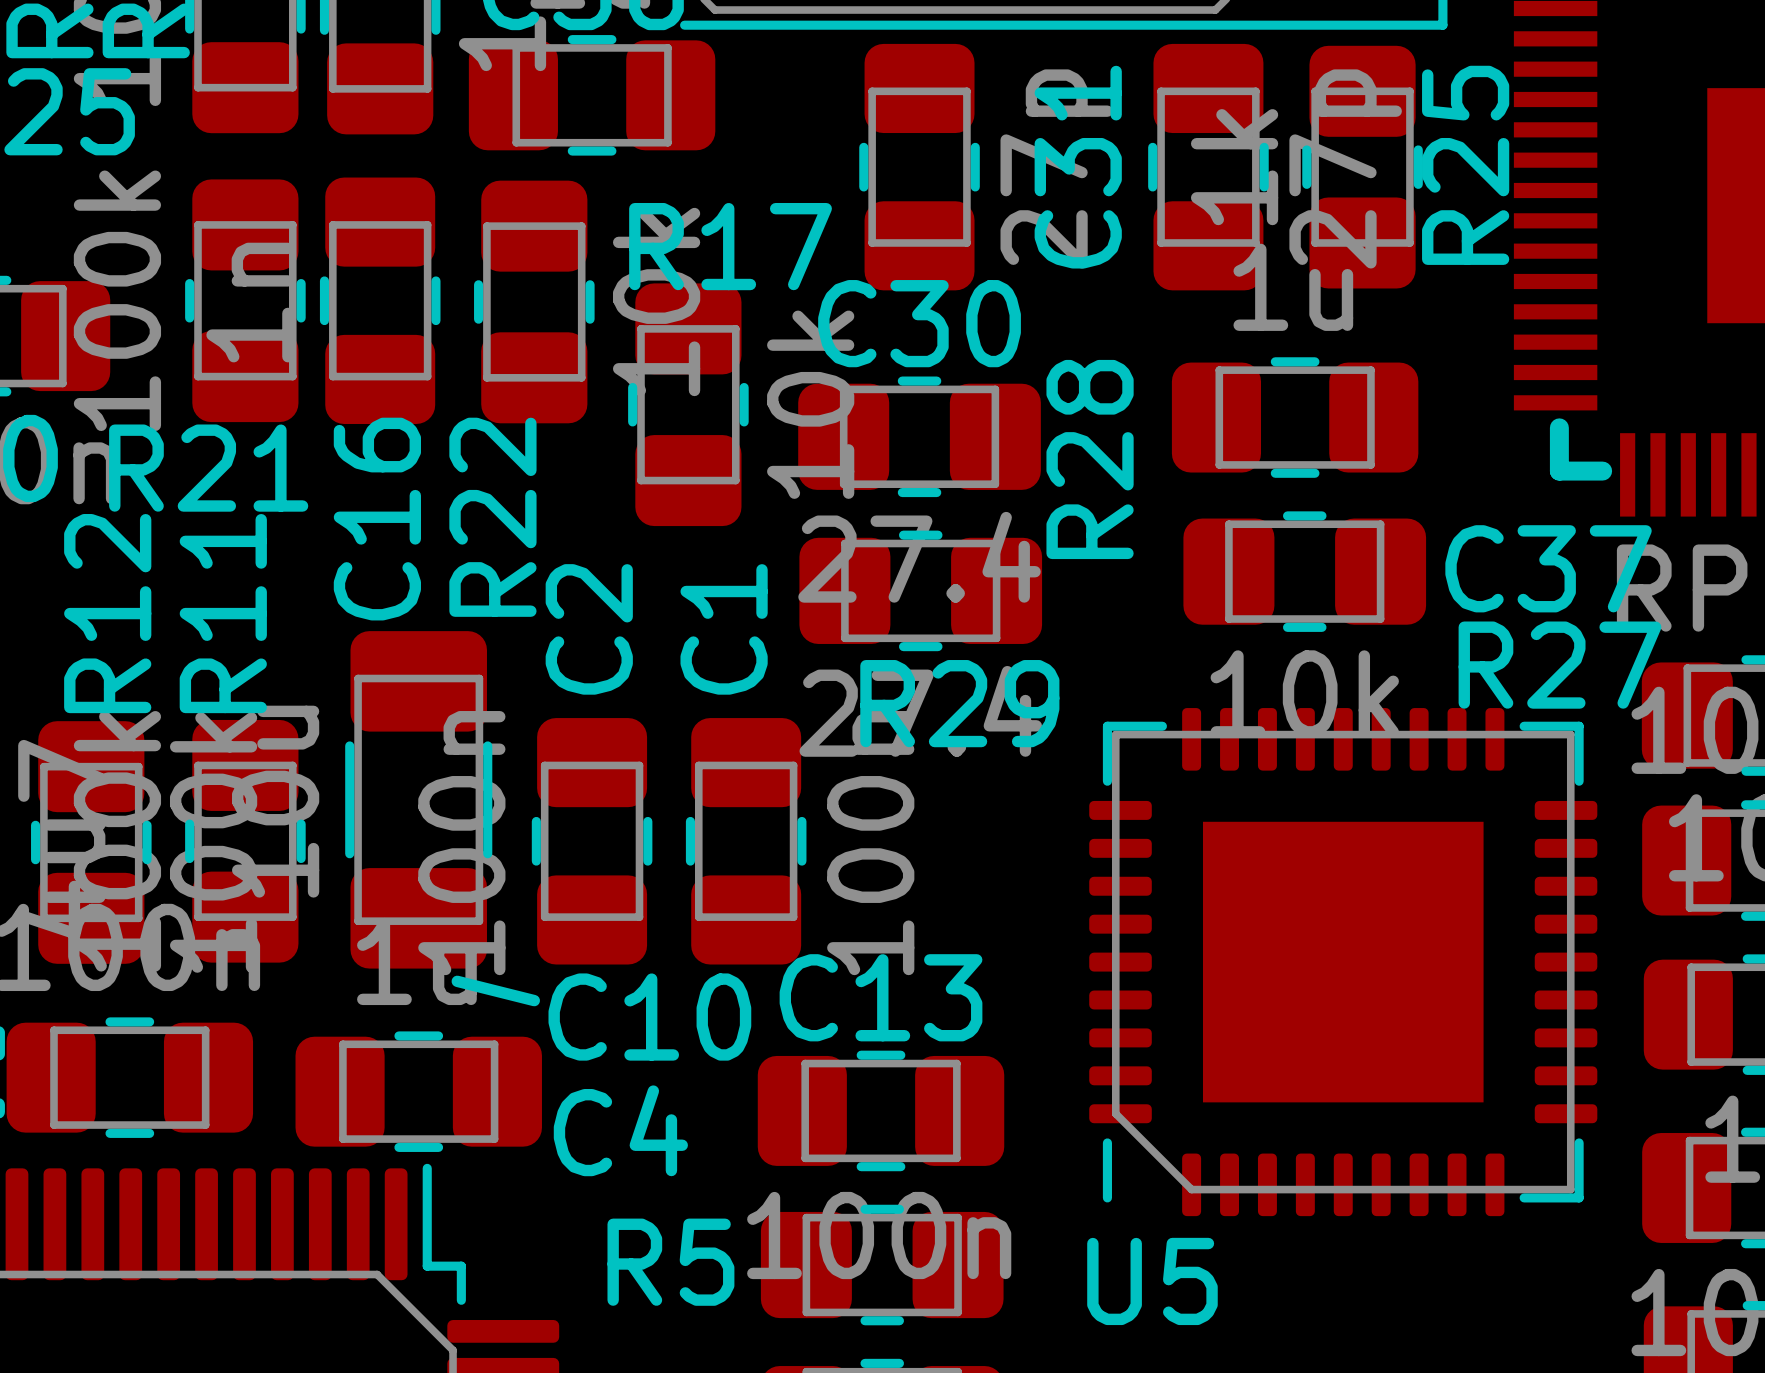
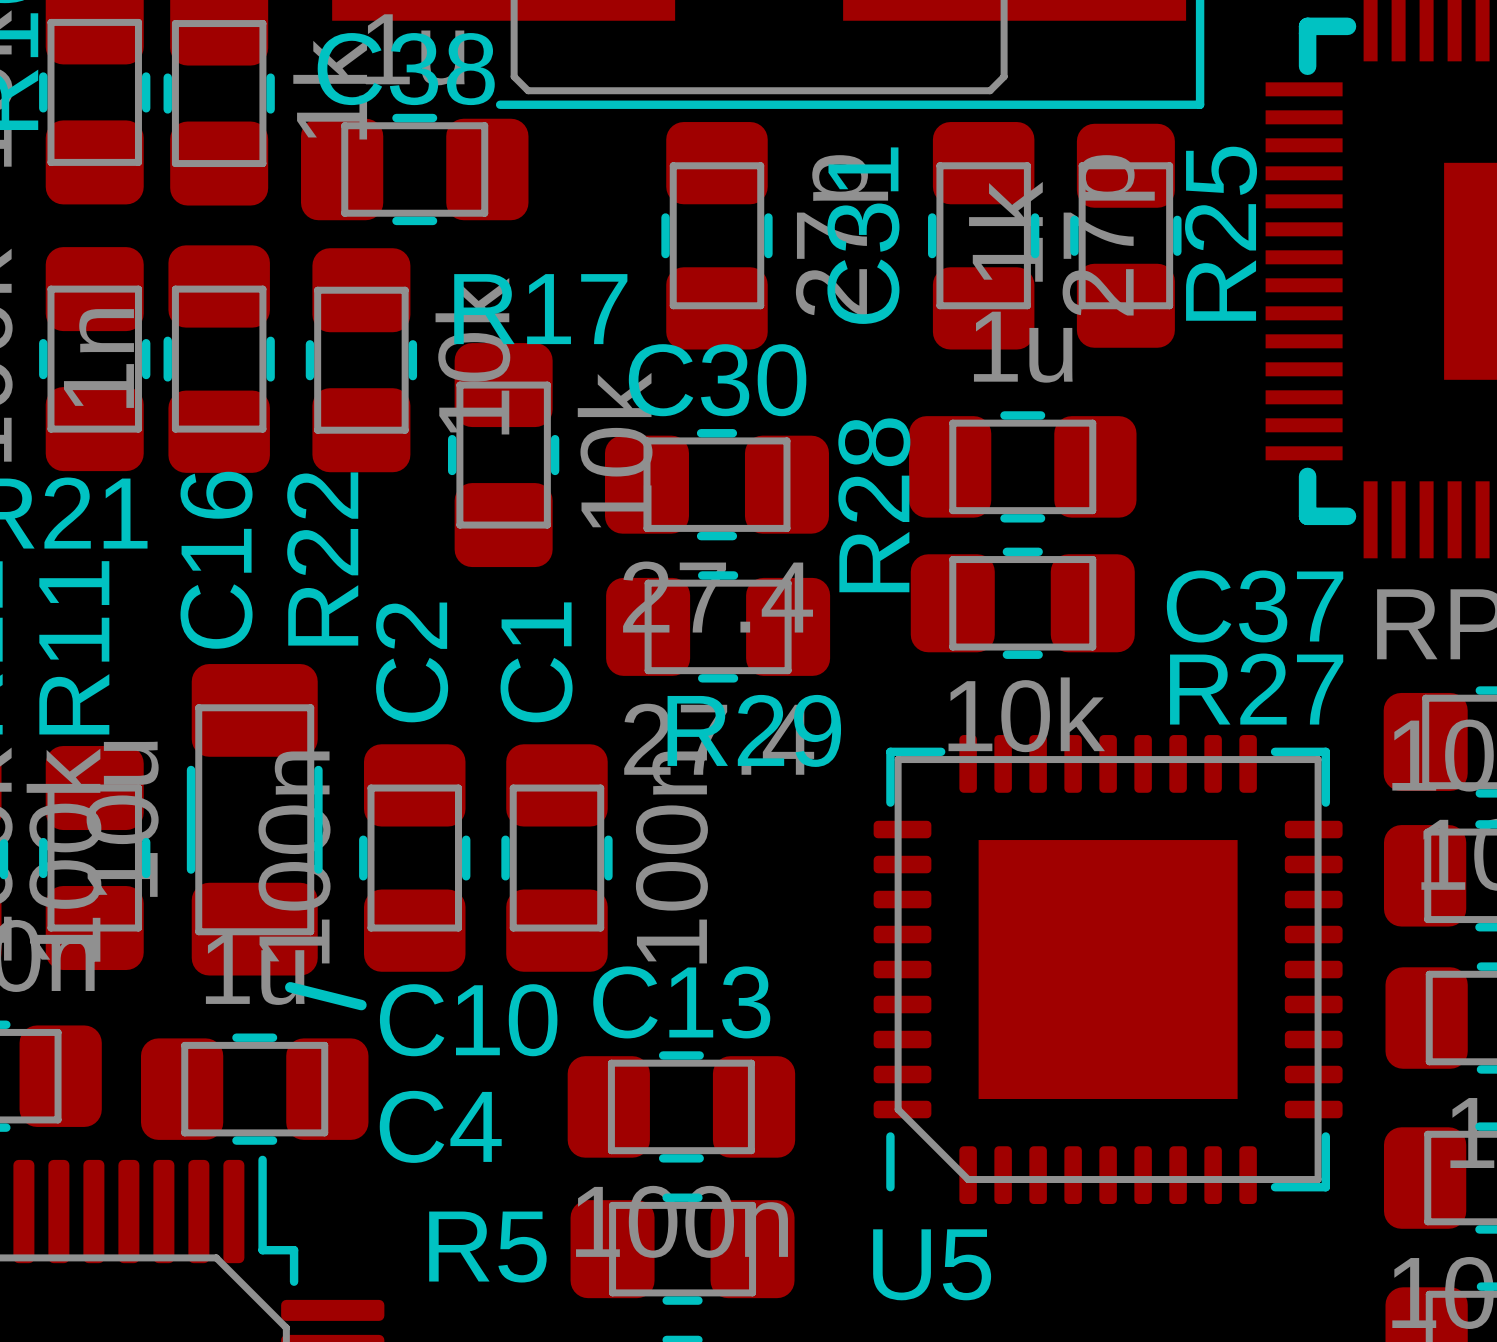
C37 position: (1295, 417) -> (1022, 466)
R27 position: (1304, 571) -> (1022, 603)

